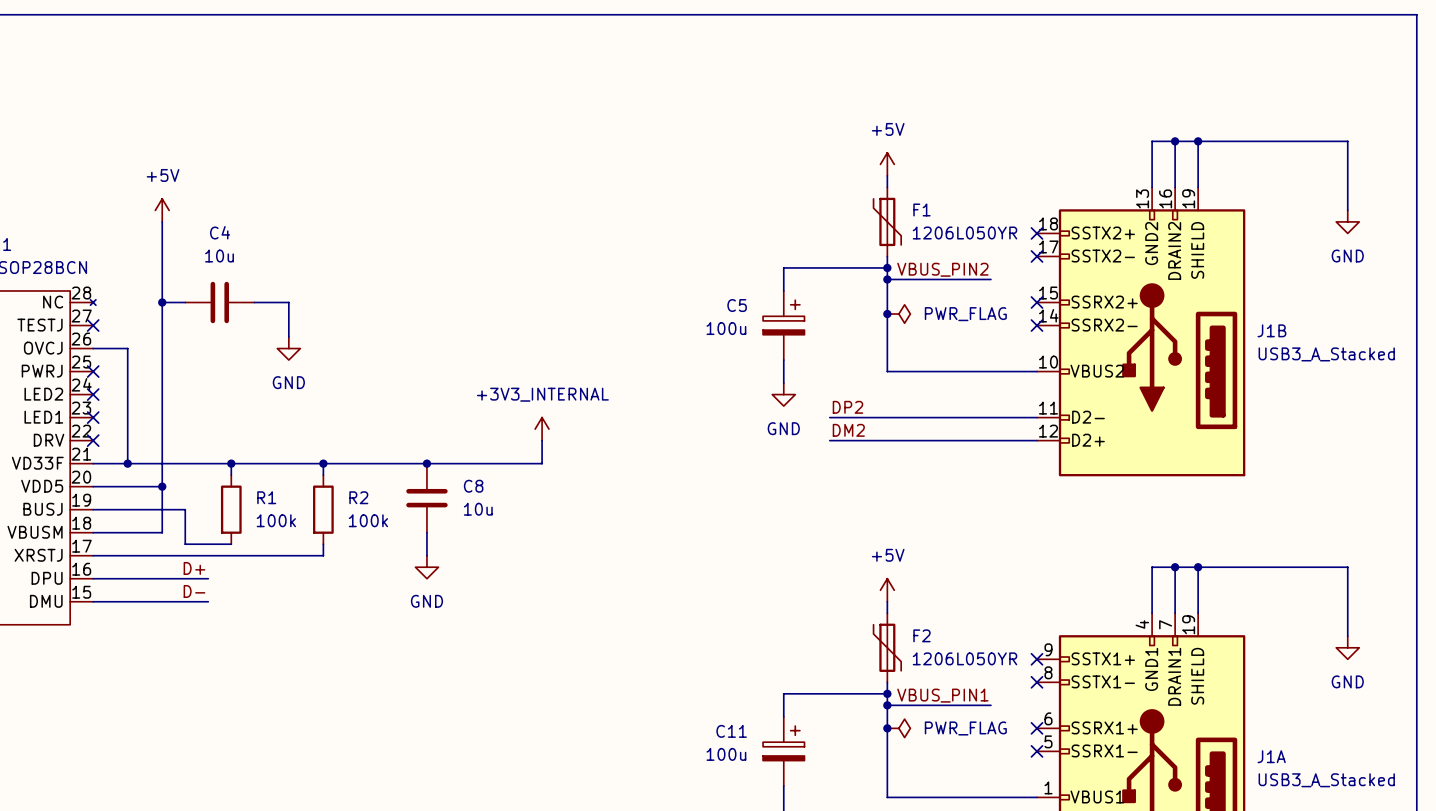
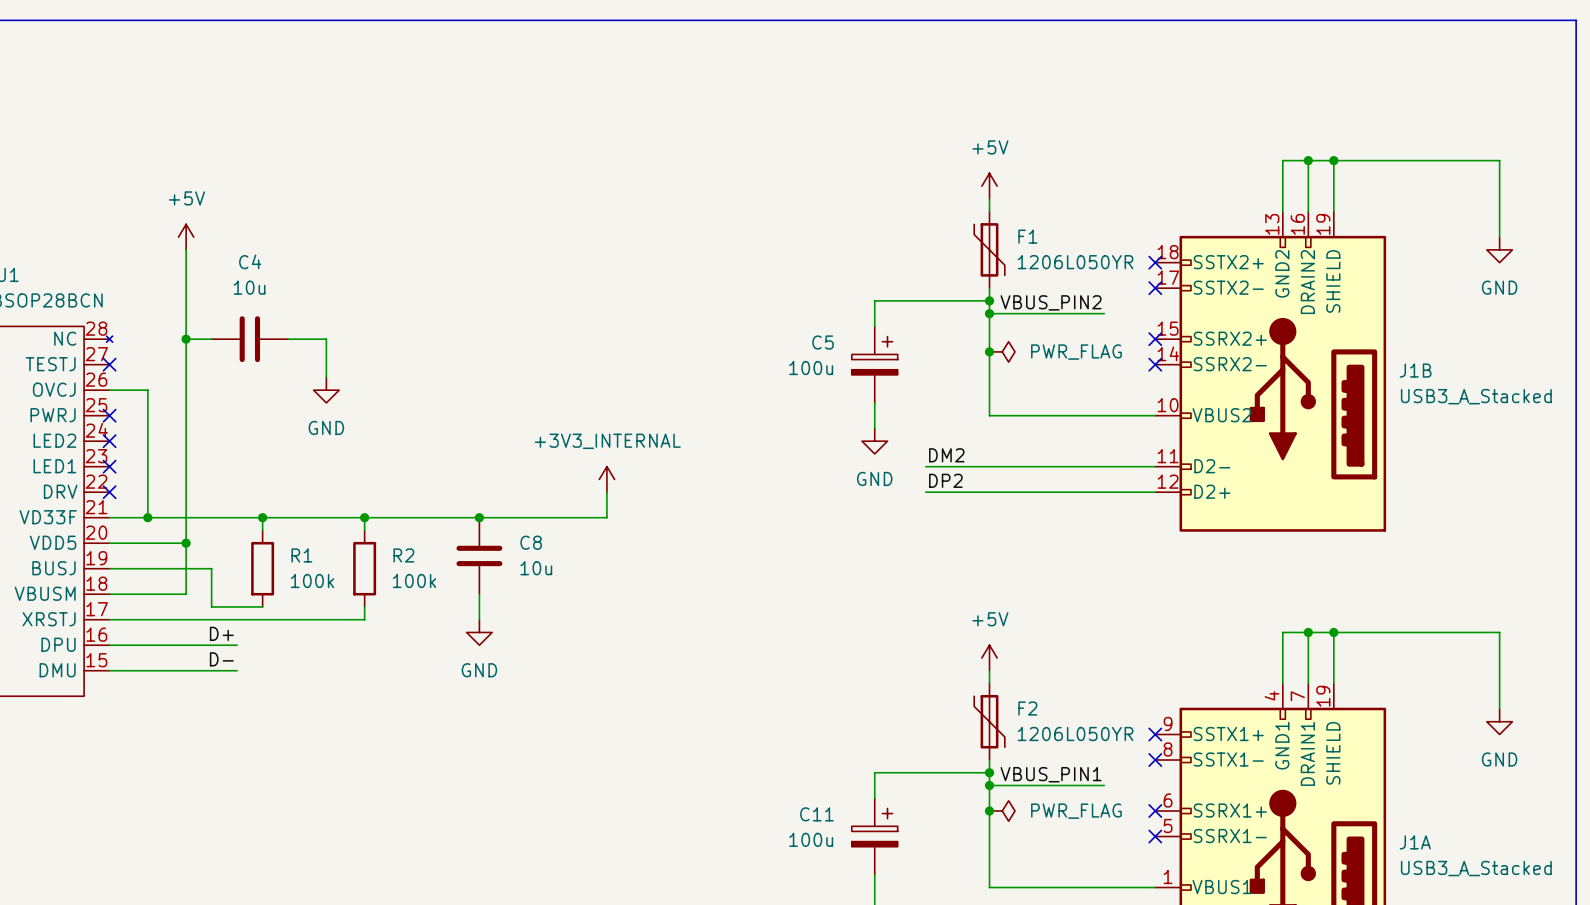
label: DP2 (847, 407) -> DM2 (946, 455)
label: DM2 (848, 430) -> DP2 (945, 480)

